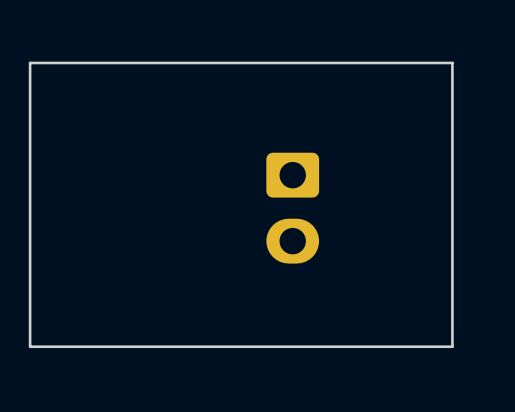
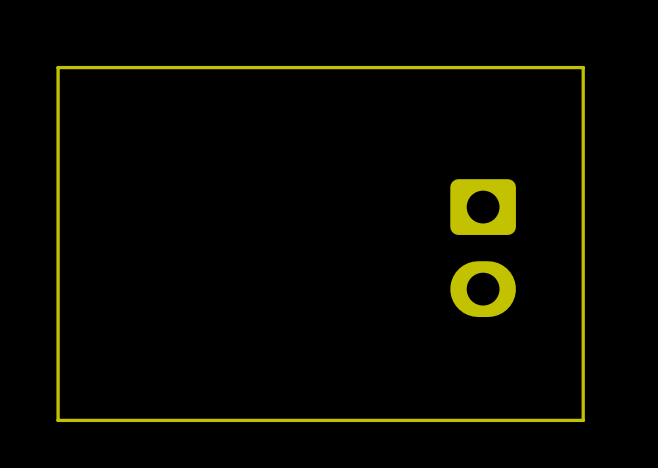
part position: (292, 208) -> (483, 248)

